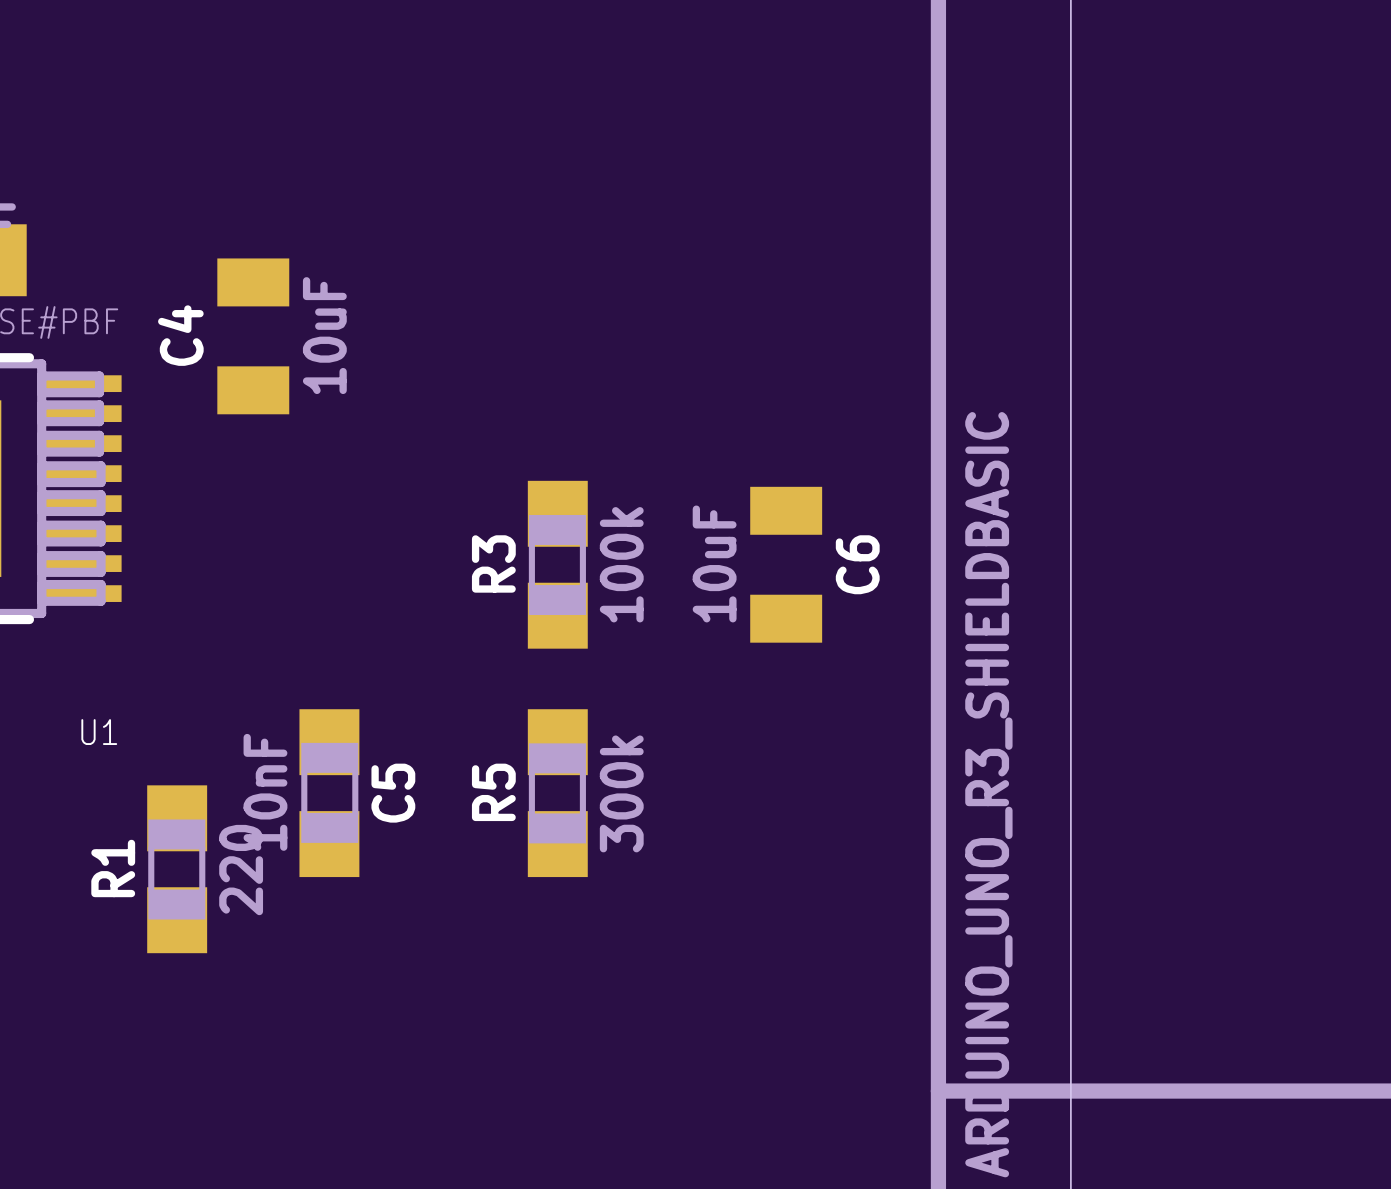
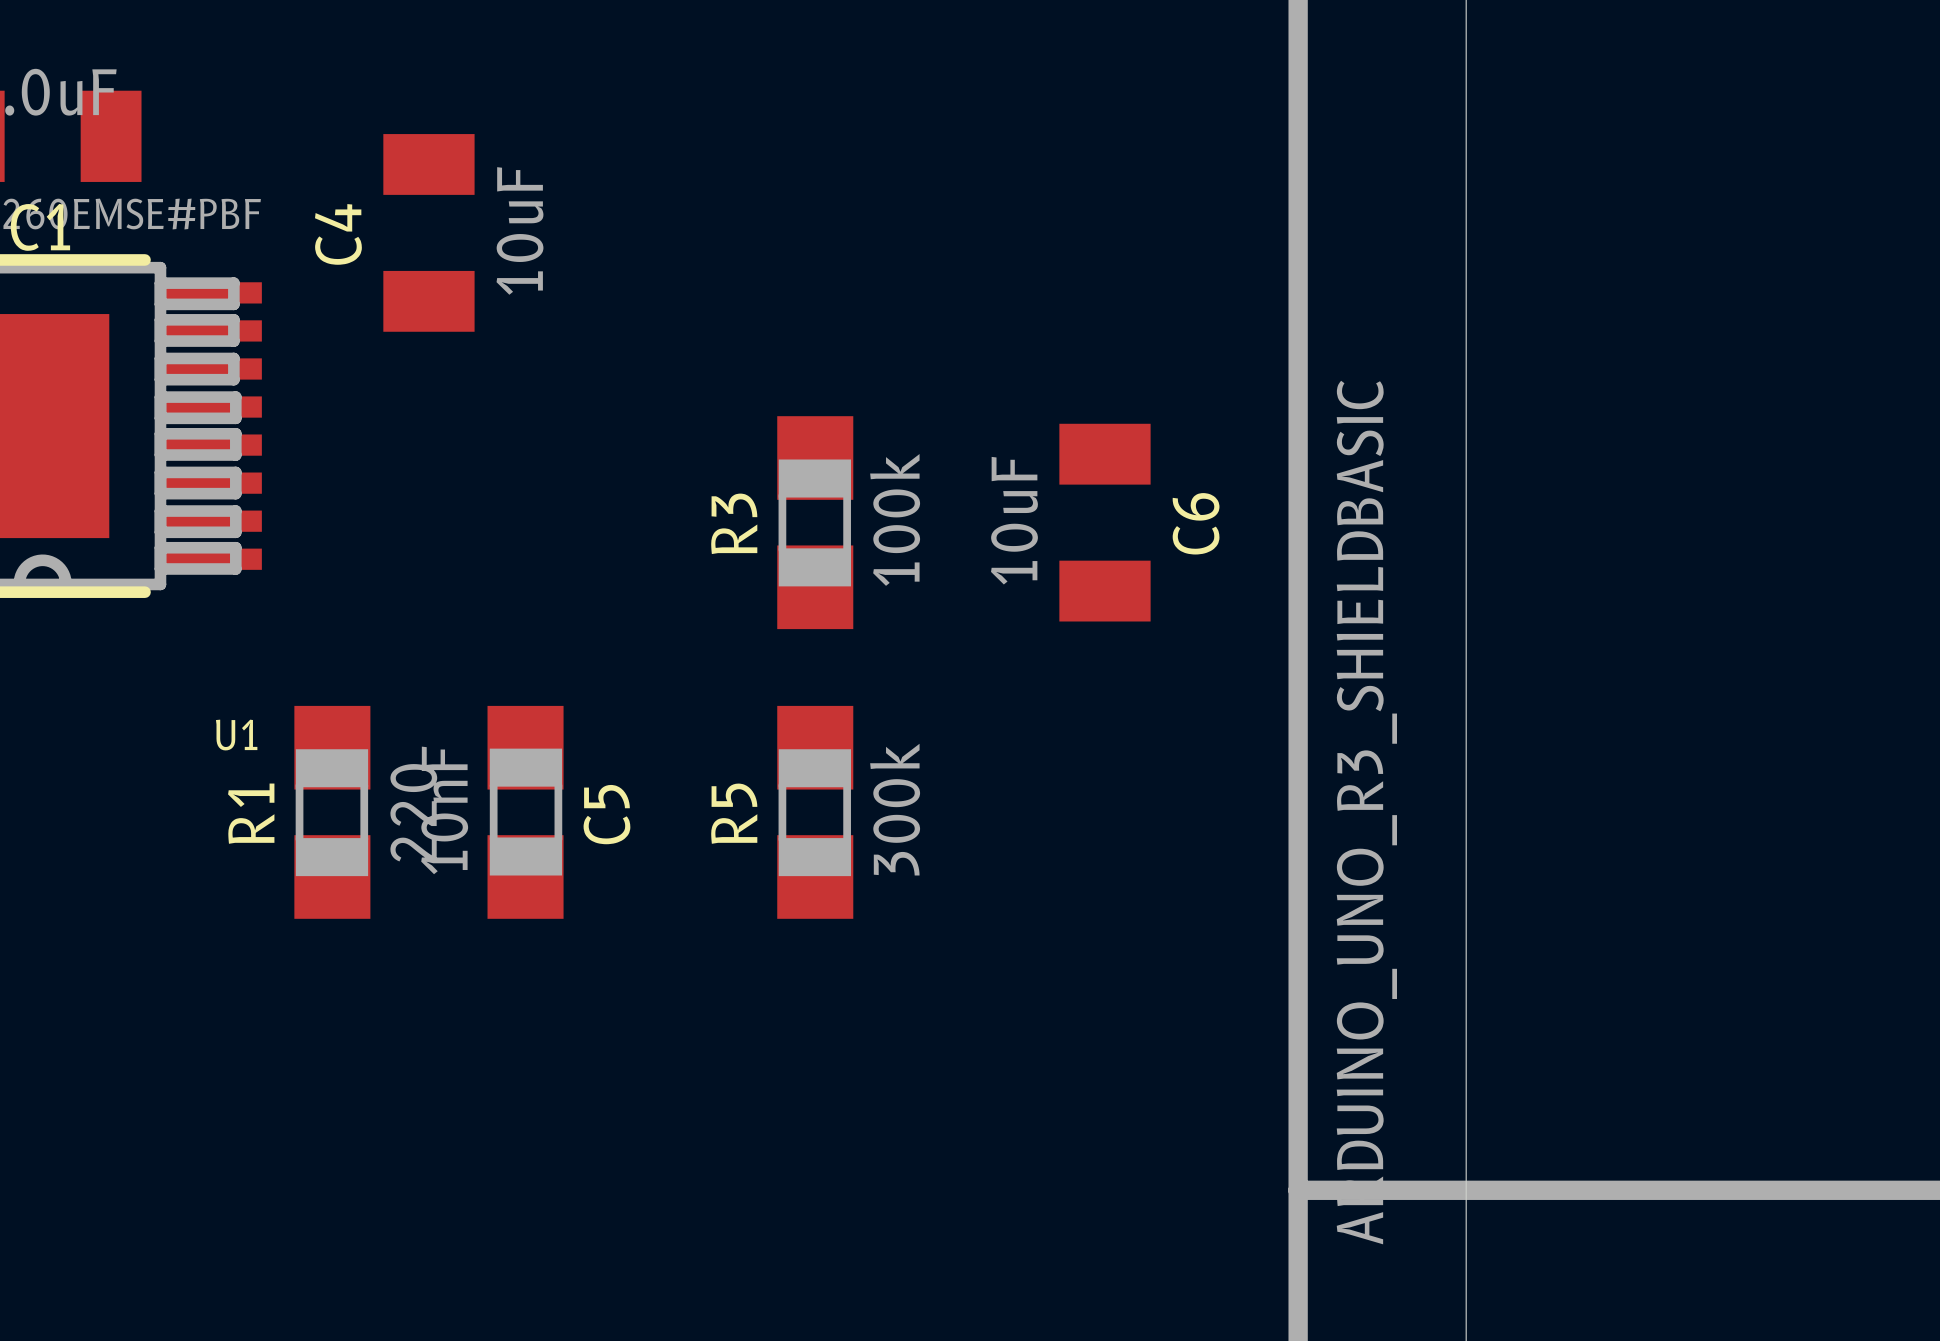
R1 position: (177, 869) -> (332, 812)

